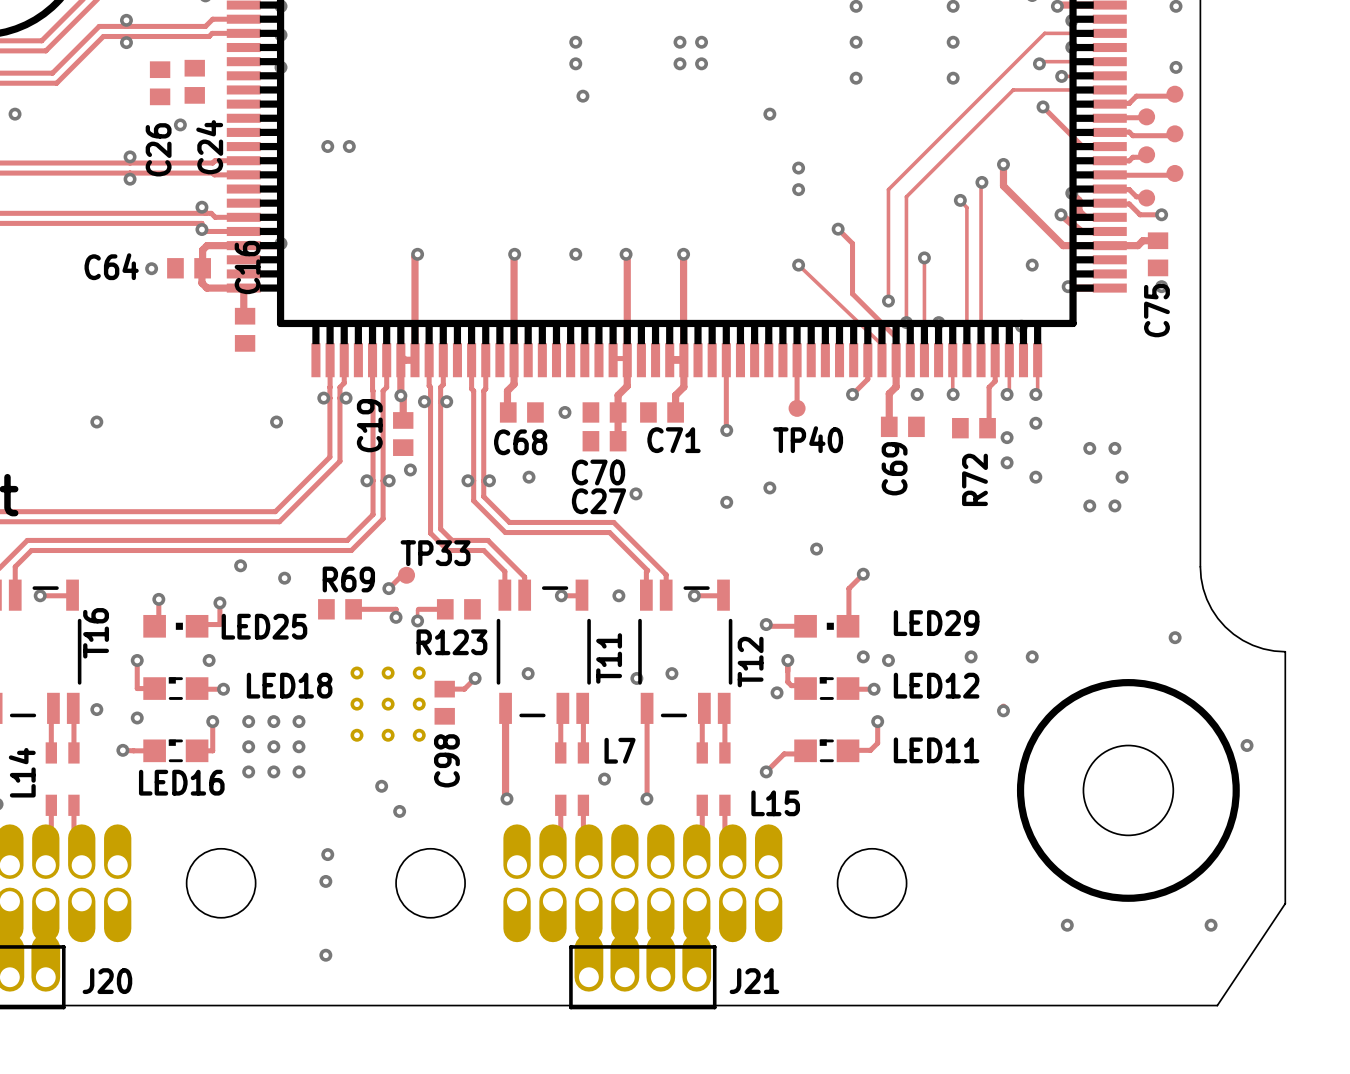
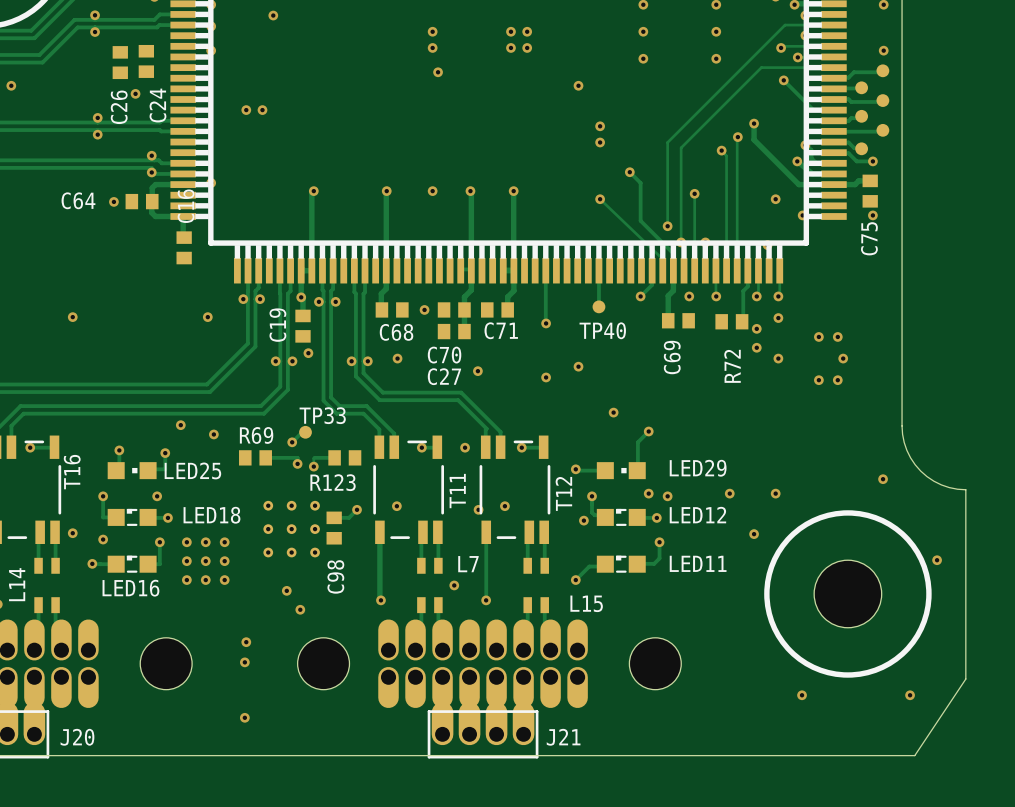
via: none -> (273, 15)

